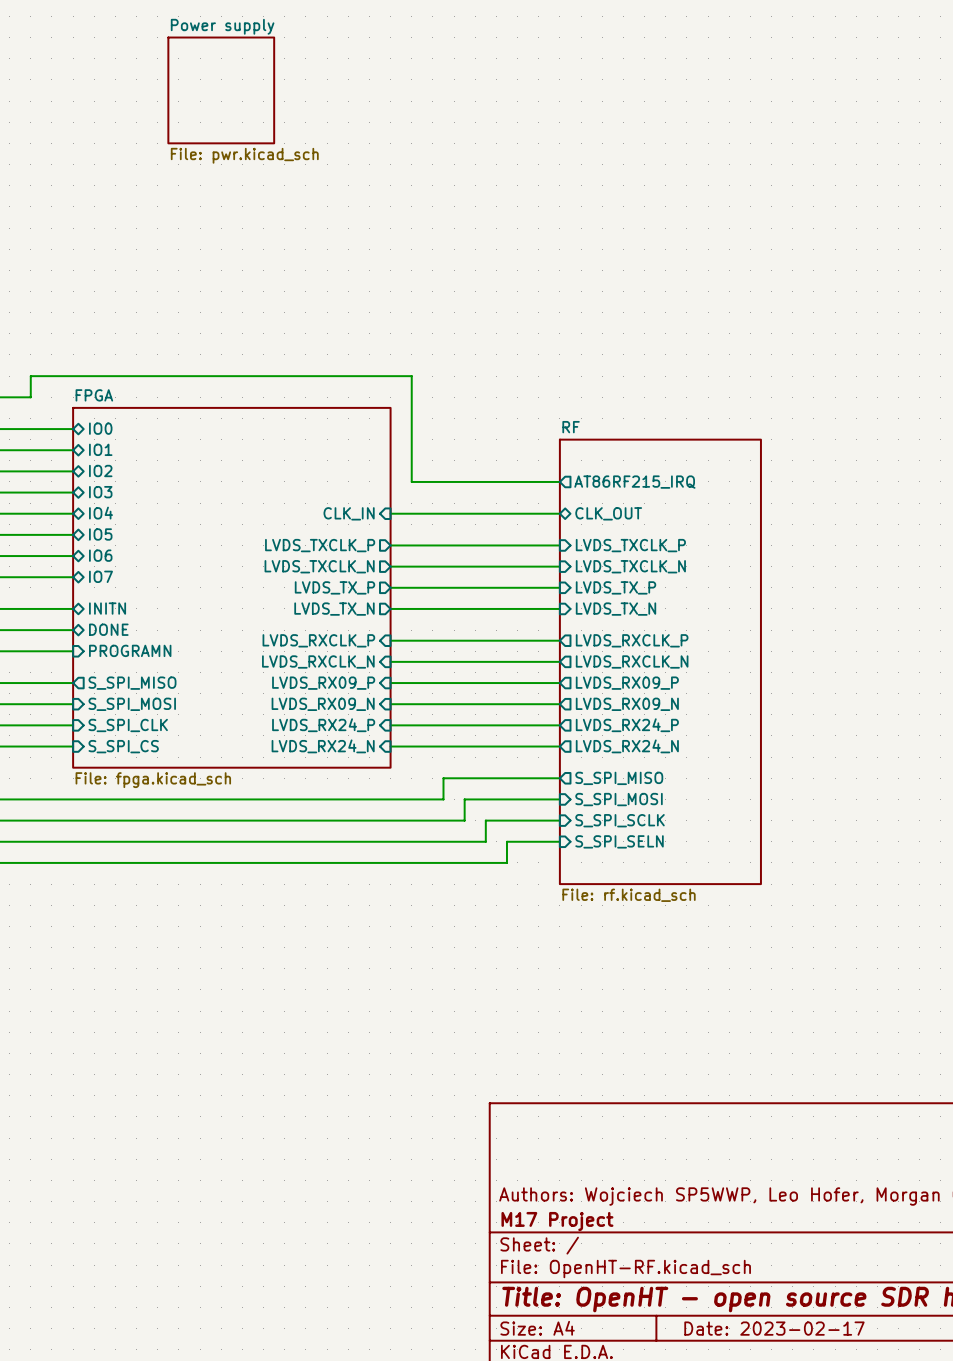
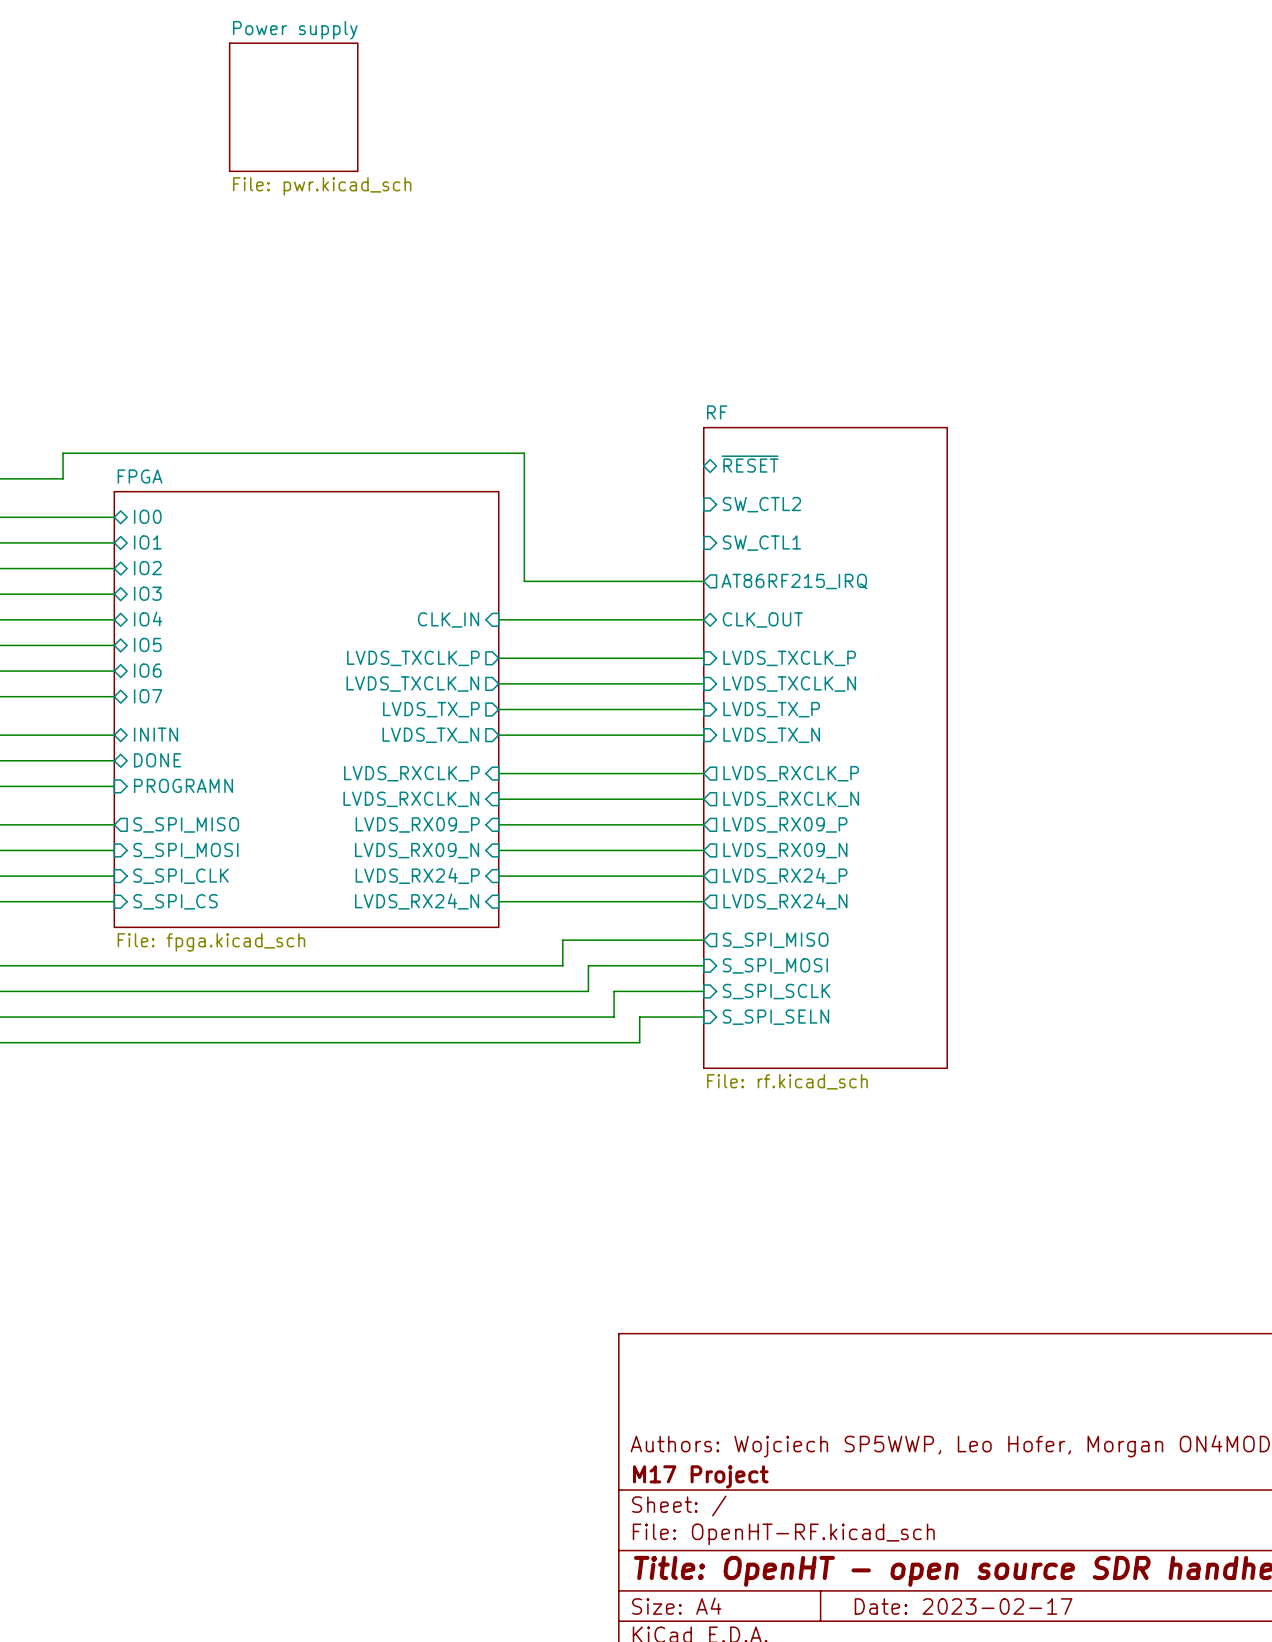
sheet pin: none -> ~{RESET} (750, 464)
sheet pin: none -> SW_CTL2 (761, 504)
sheet pin: none -> SW_CTL1 (761, 543)
sheet RF: none -> File: rf.kicad_sch (825, 747)
sheet RF: File: rf.kicad_sch (660, 661) -> none

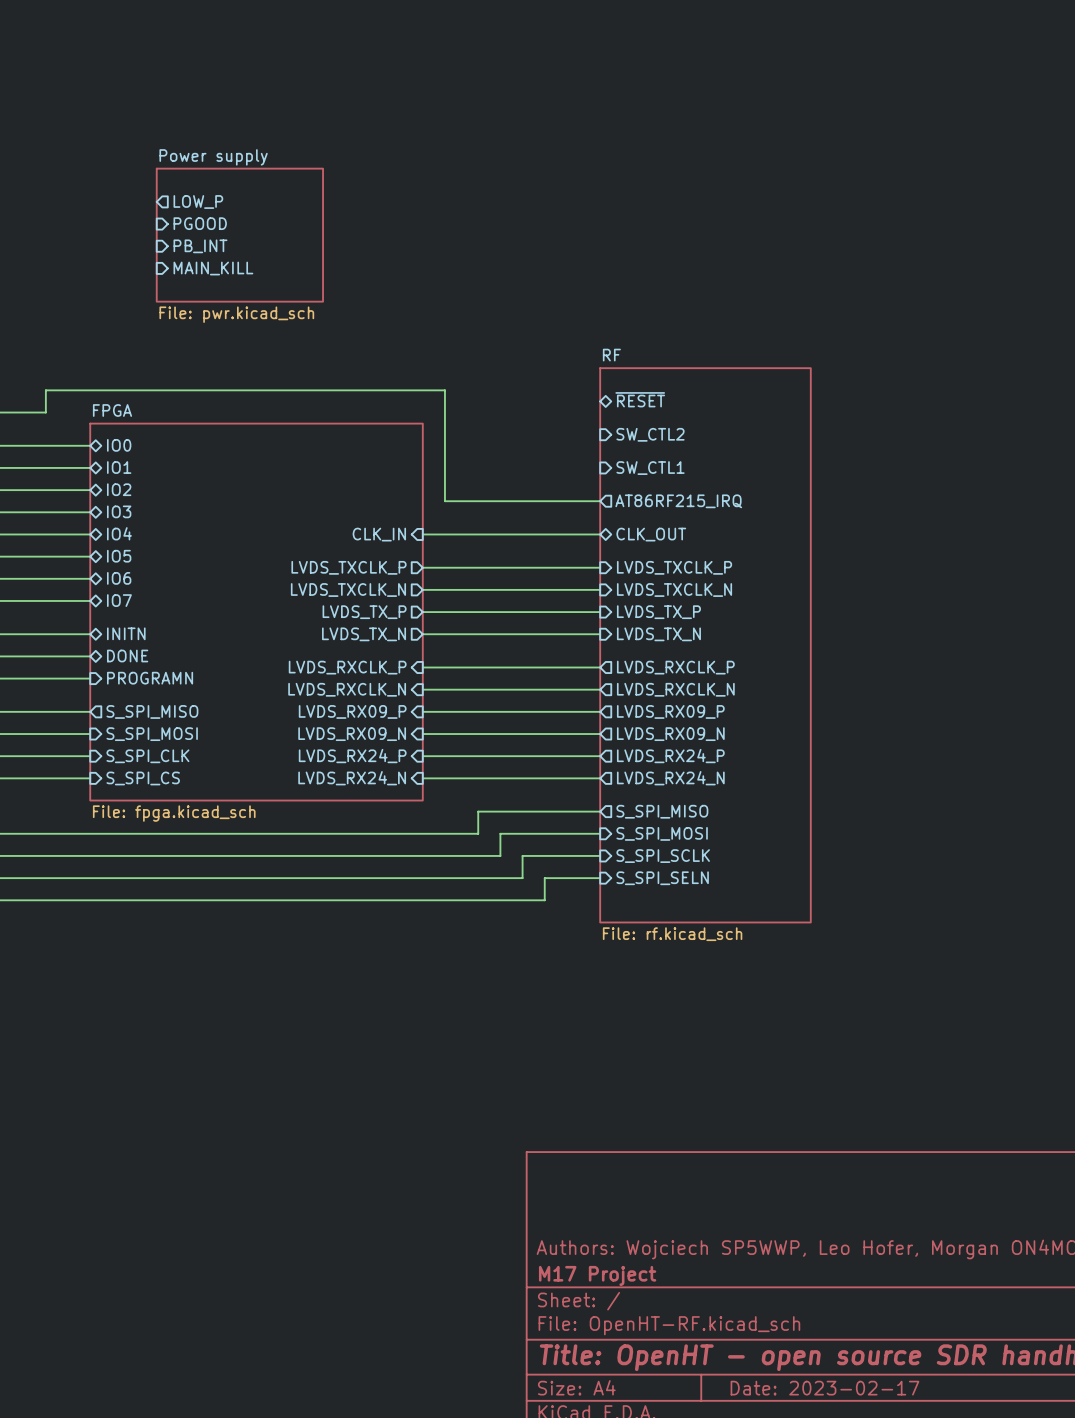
sheet Power supply: File: pwr.kicad_sch (293, 107) -> none
sheet pin: none -> LOW_P (198, 202)
sheet pin: none -> PGOOD (200, 223)
sheet Power supply: none -> File: pwr.kicad_sch (239, 235)
sheet pin: none -> PB_INT (200, 246)
sheet pin: none -> MAIN_KILL (213, 268)

